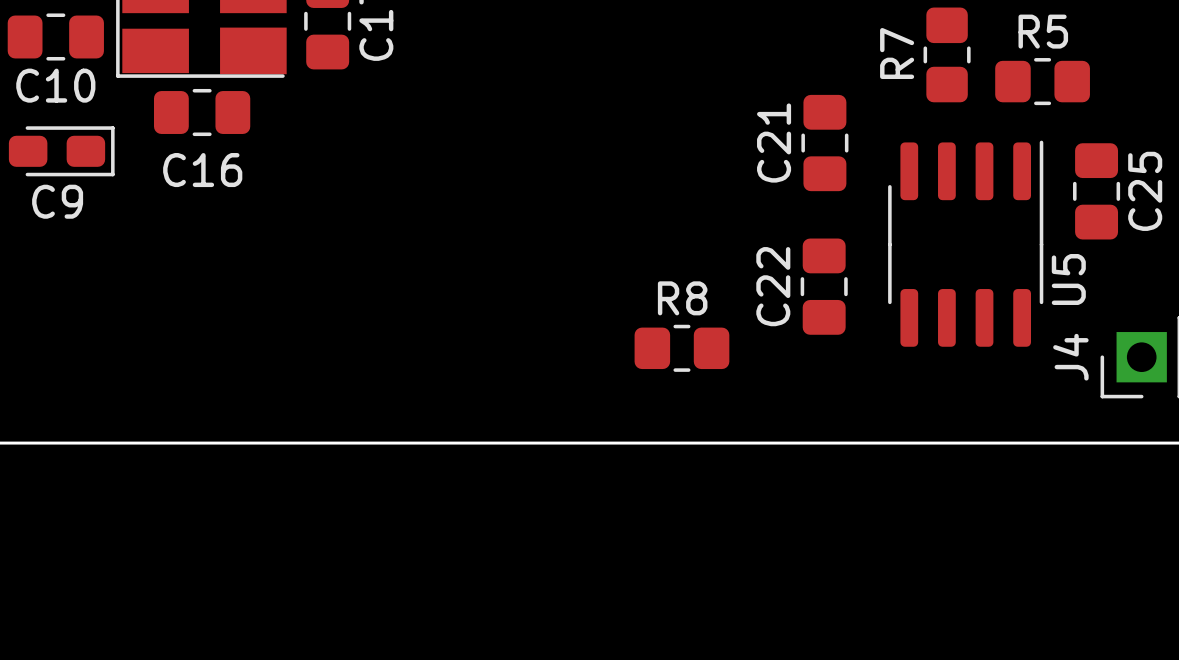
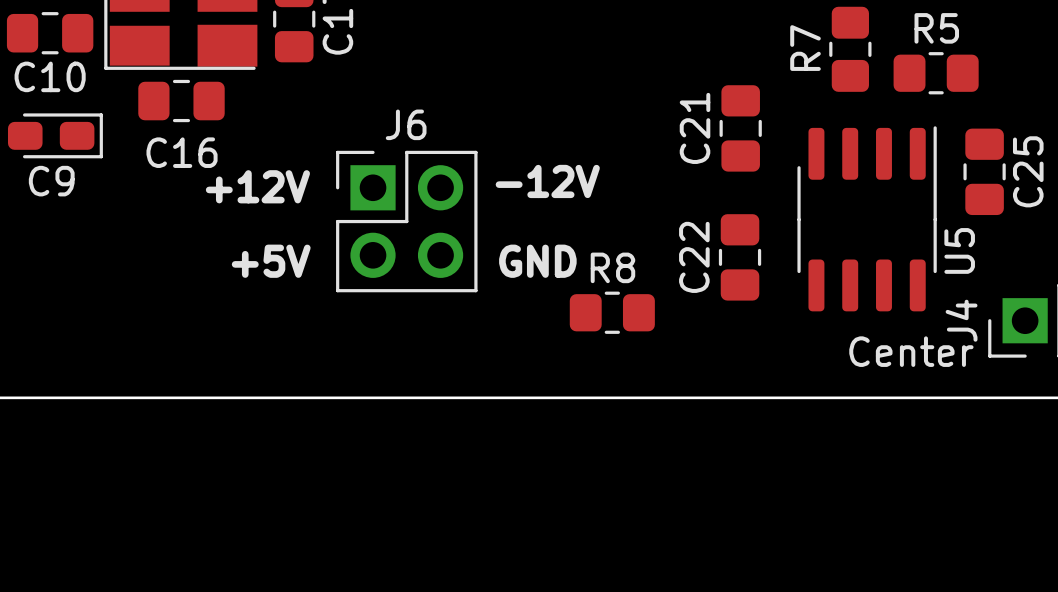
text: none -> -12V (547, 181)
text: none -> +12V (257, 186)
J6: none -> (406, 221)
text: none -> +5V (271, 261)
text: none -> GND (537, 261)
text: none -> Center (911, 351)

